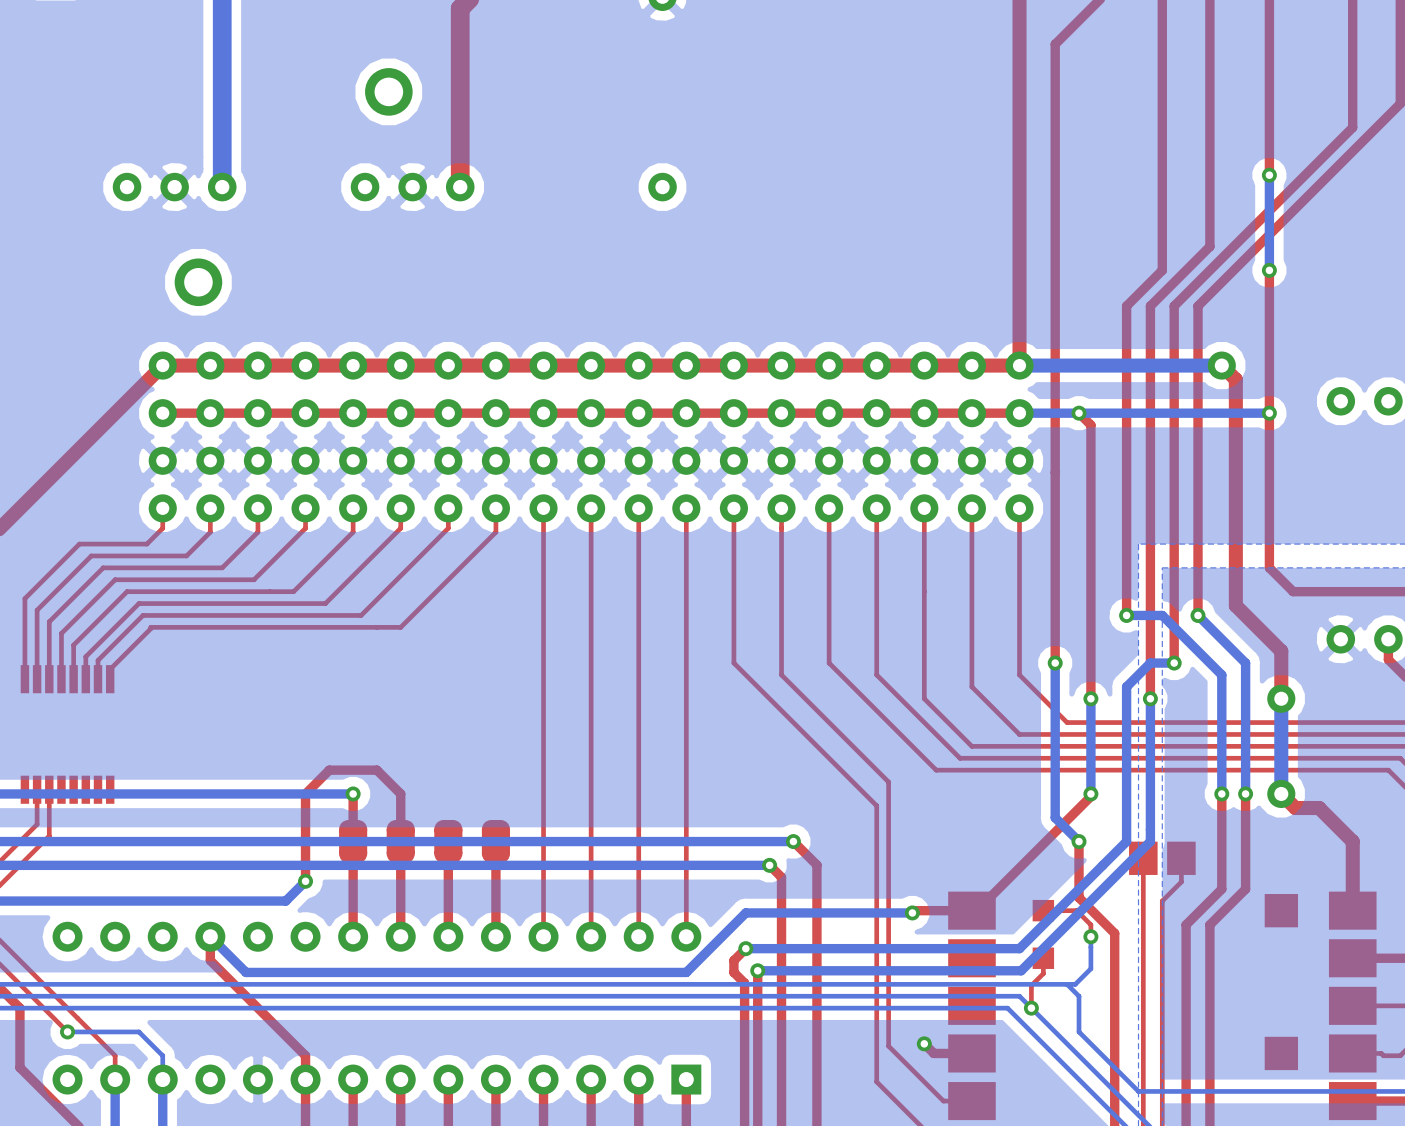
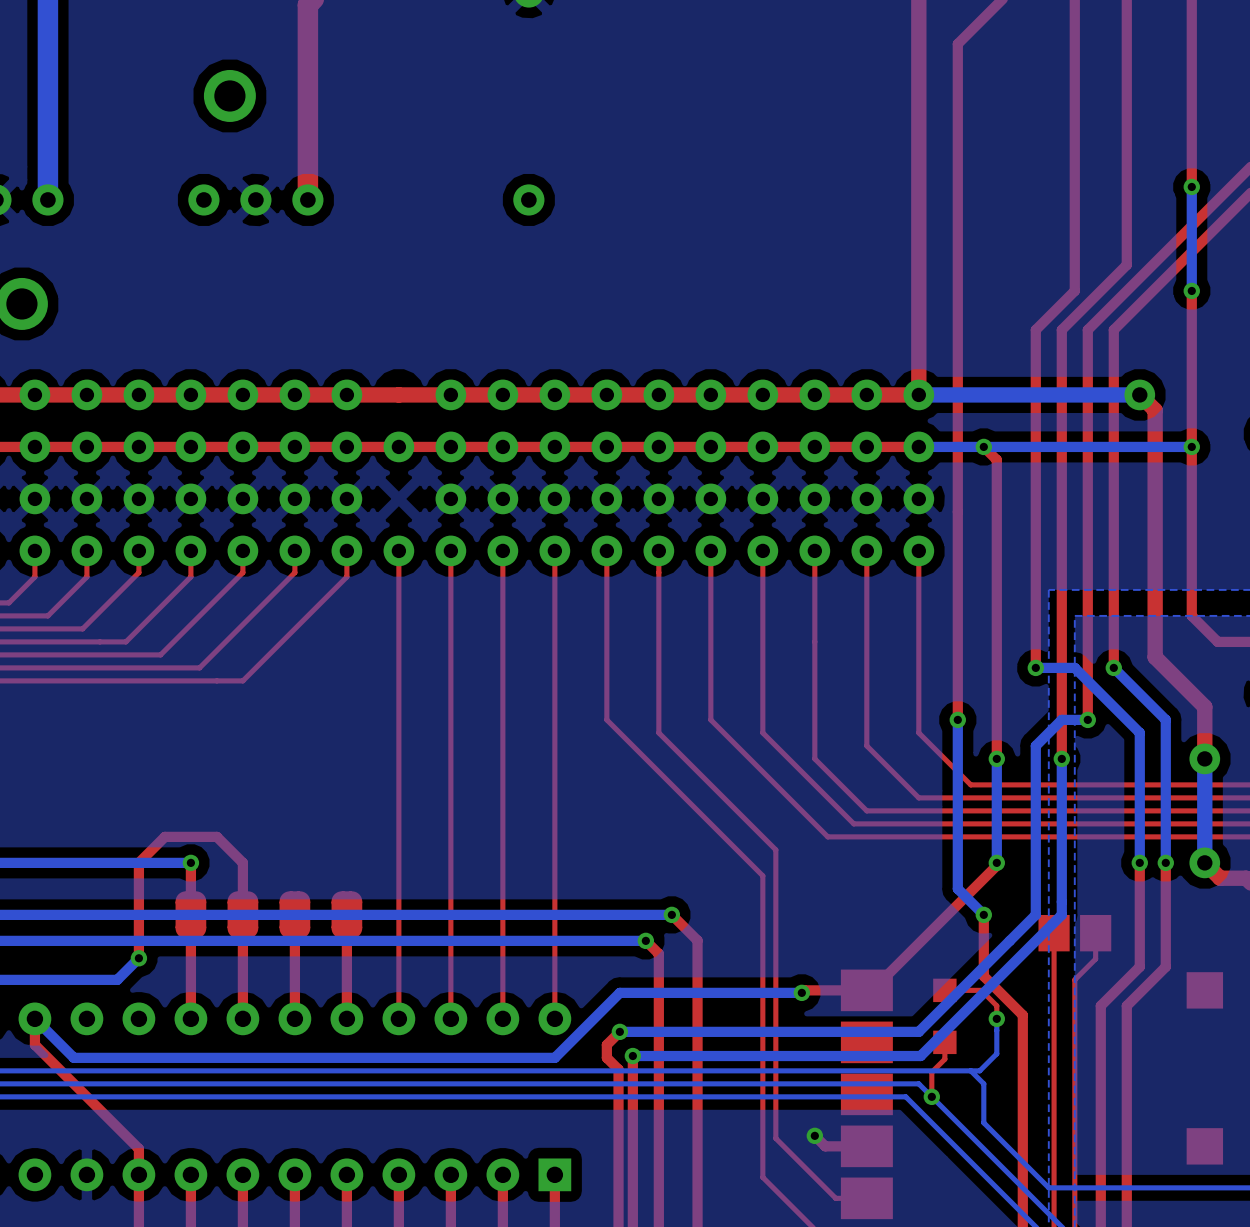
part: (543, 365) -> none
part: (543, 460) -> none

